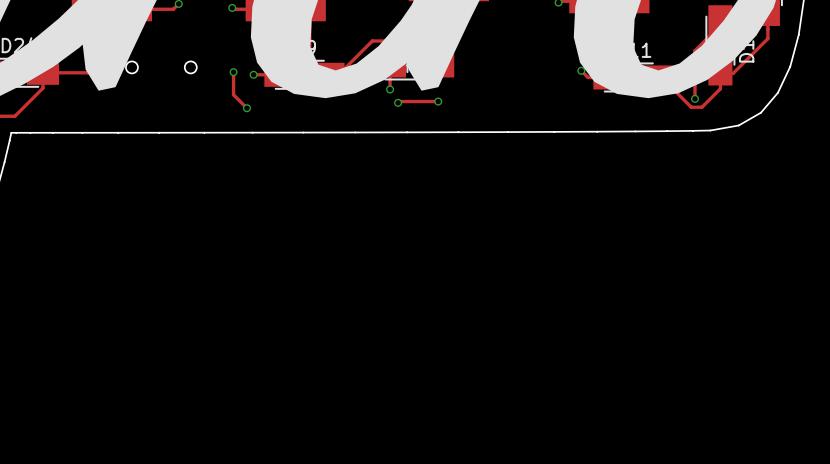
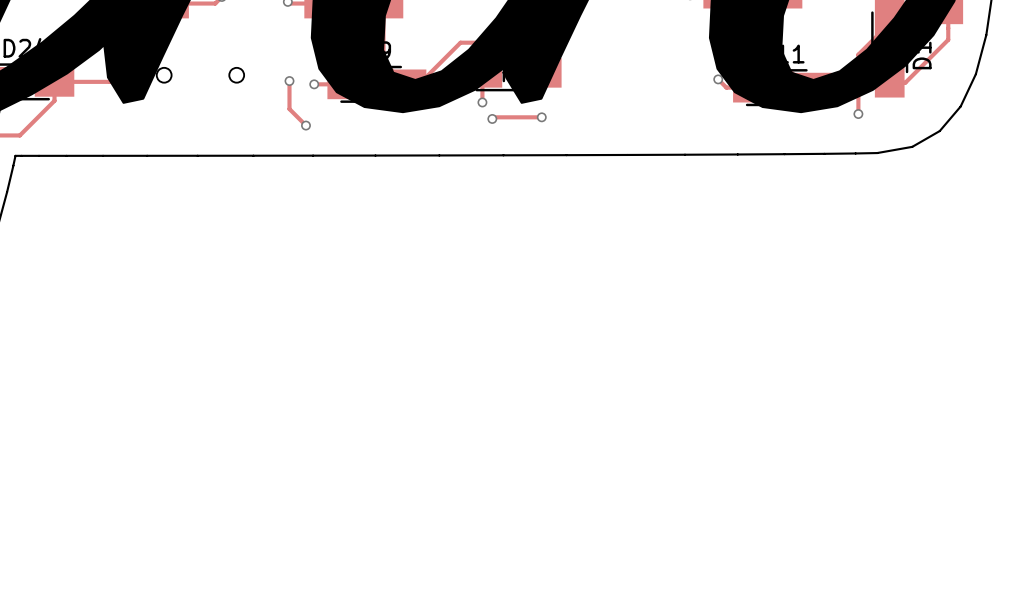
track: (720, 69) (720, 88) (702, 107) (691, 107) (661, 77) (657, 77) -> none

